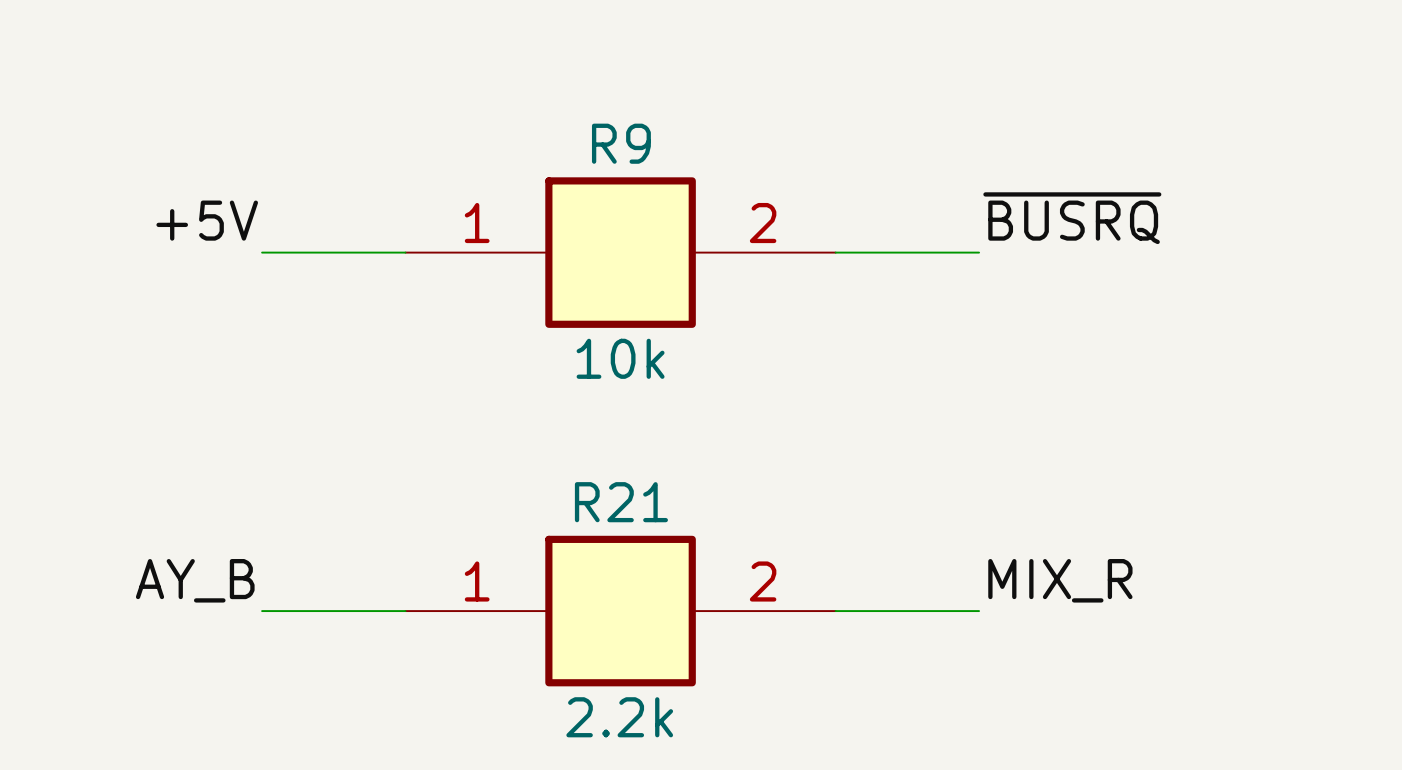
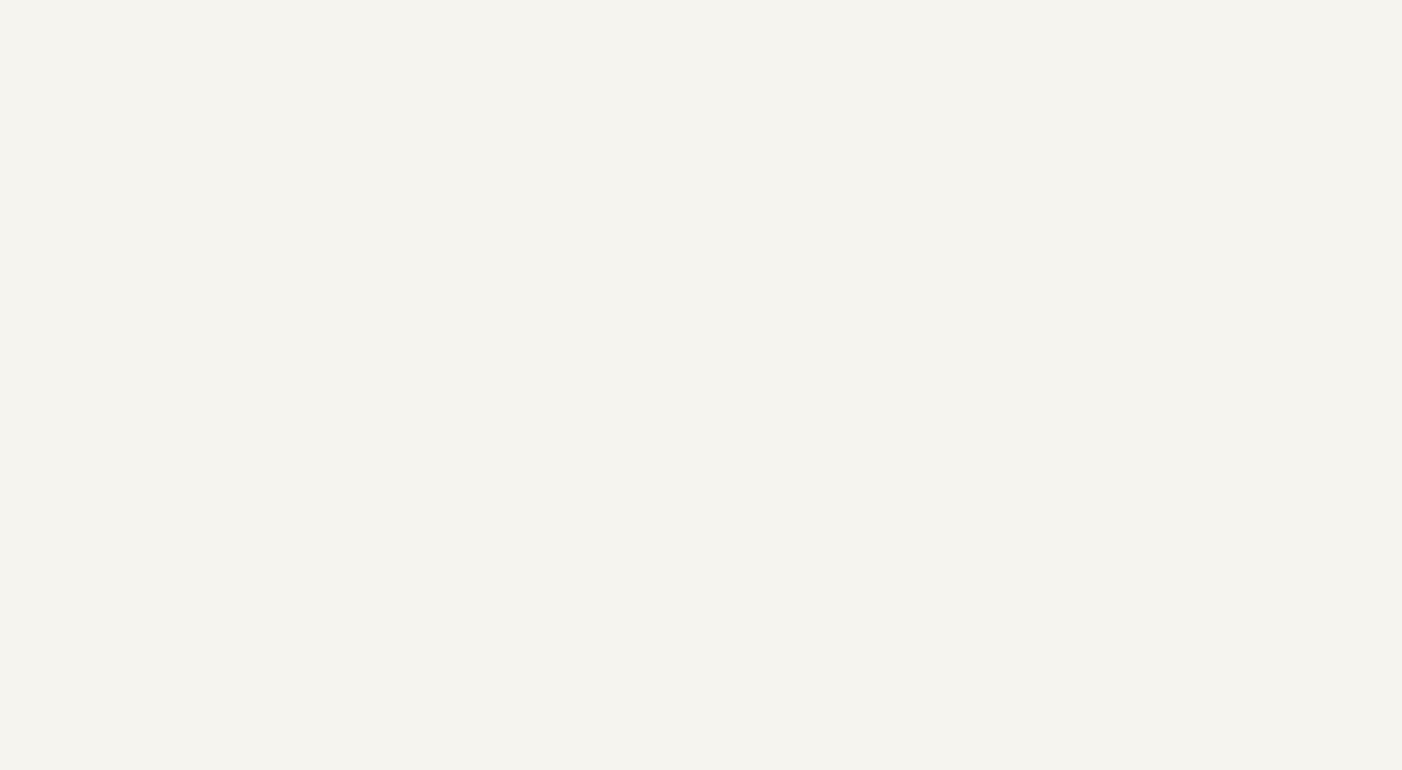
label: ~{BUSRQ} (1072, 218) -> none
label: +5V (207, 220) -> none
wire: (262, 252) (405, 252) -> none
R9: 10k (620, 252) -> none
wire: (835, 252) (979, 252) -> none
label: AY_B (195, 580) -> none
label: MIX_R (1060, 580) -> none
wire: (262, 611) (405, 611) -> none
R21: 2.2k (620, 611) -> none
wire: (835, 611) (979, 611) -> none

